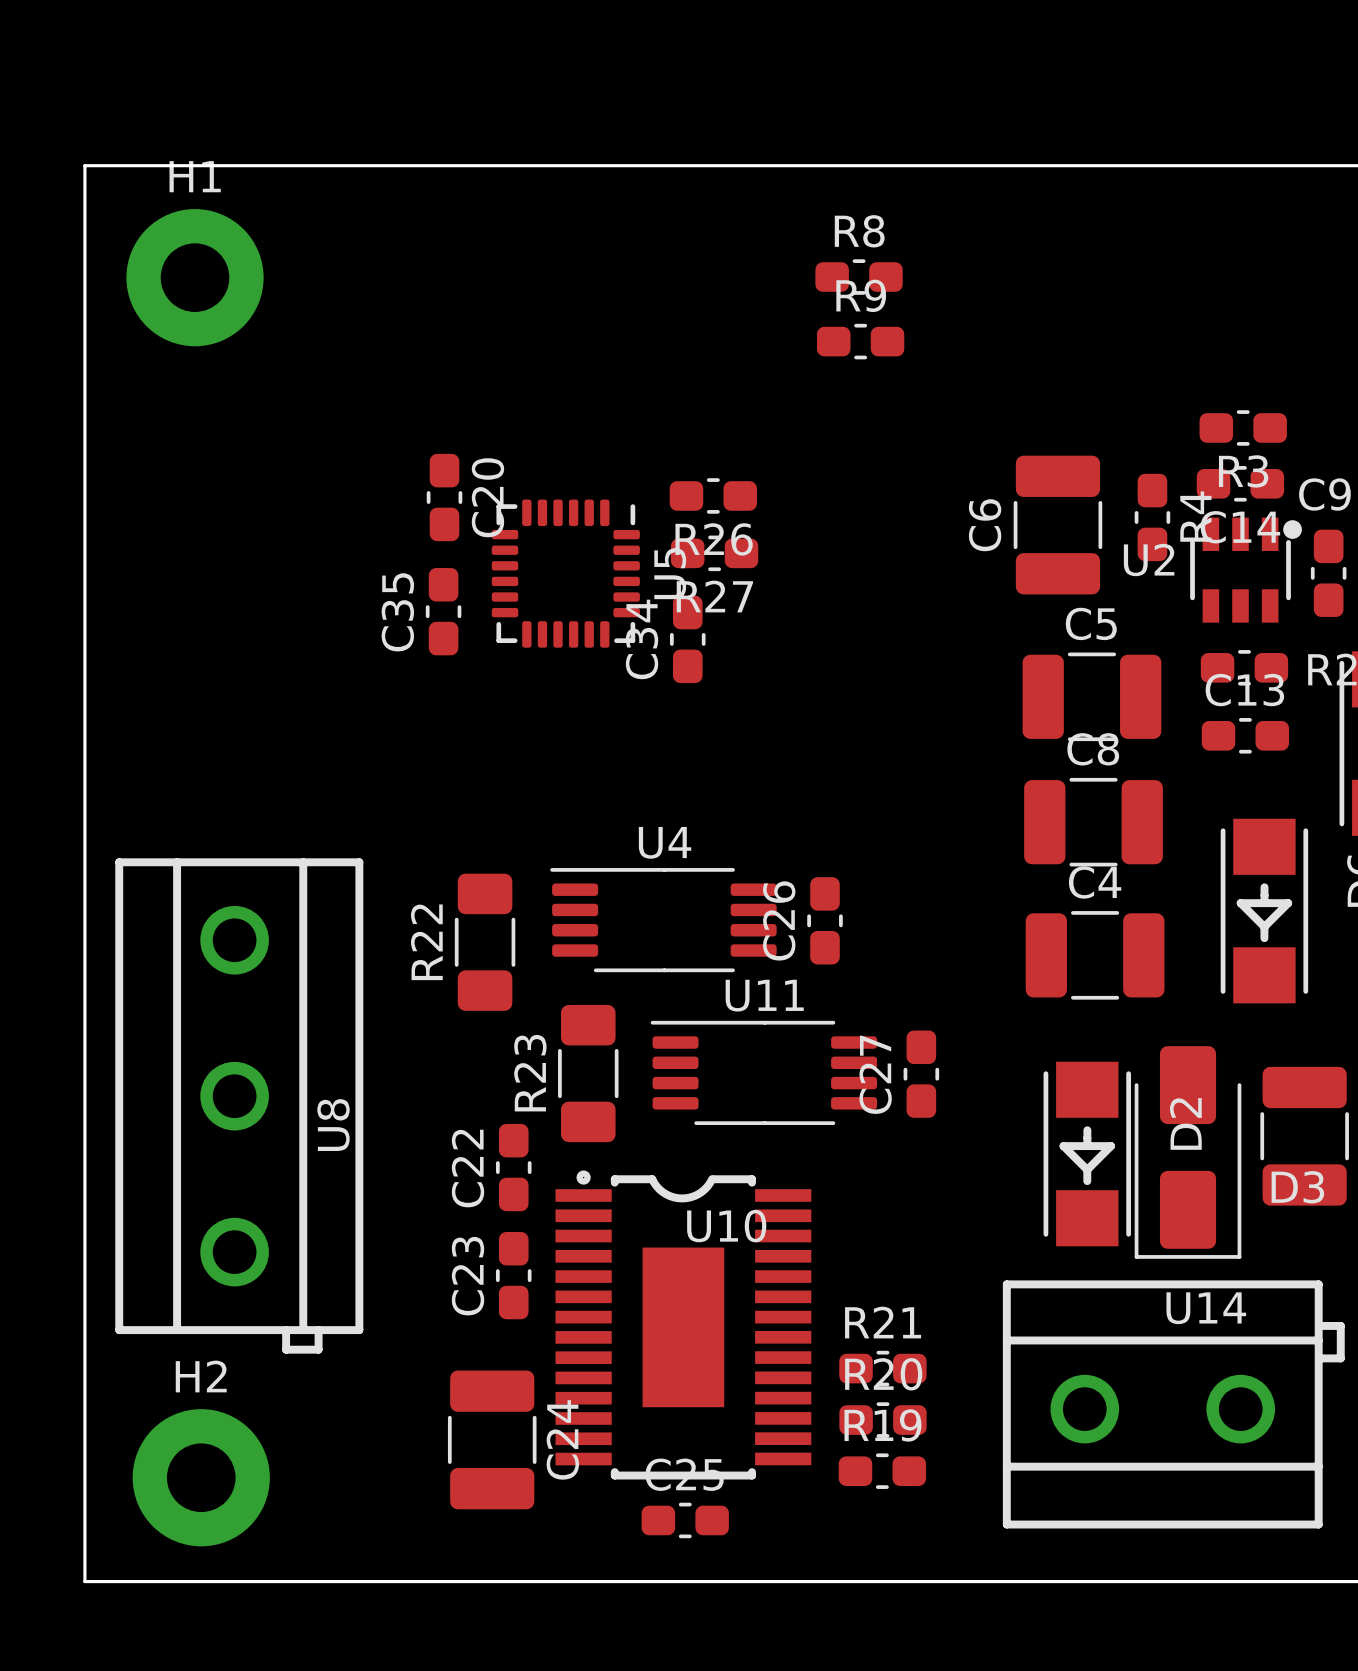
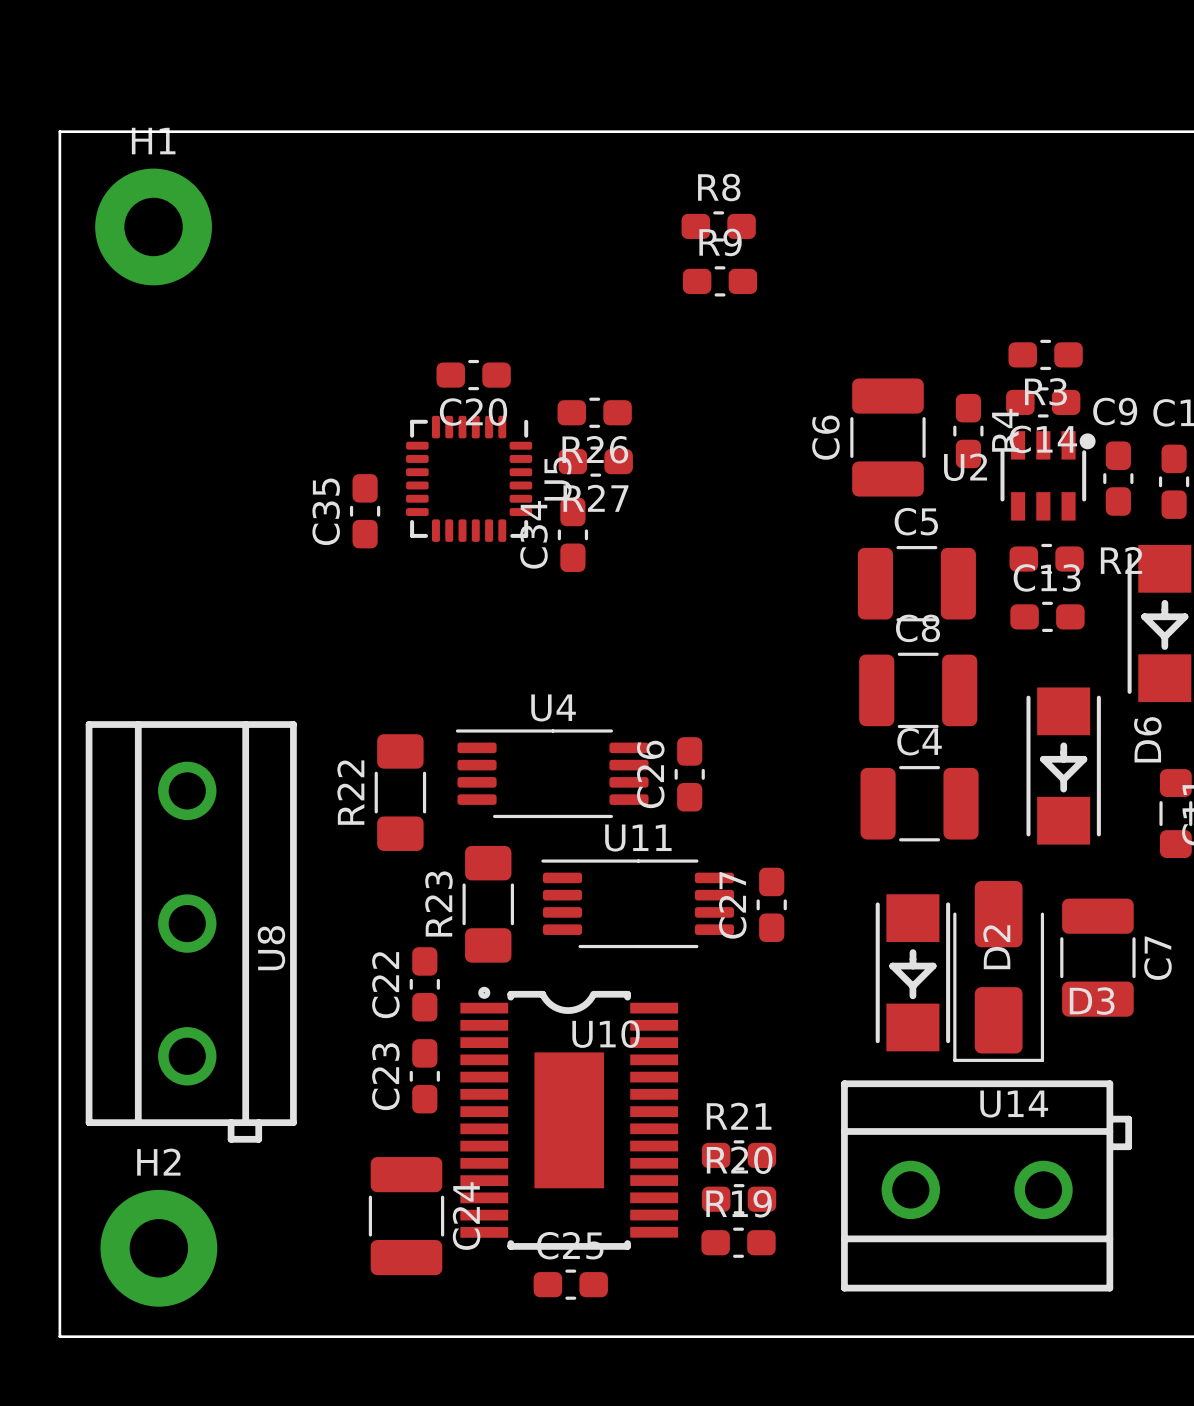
C20 rotation: 0° (444, 497) -> 90° clockwise (473, 375)
C20 position: (444, 497) -> (473, 375)

